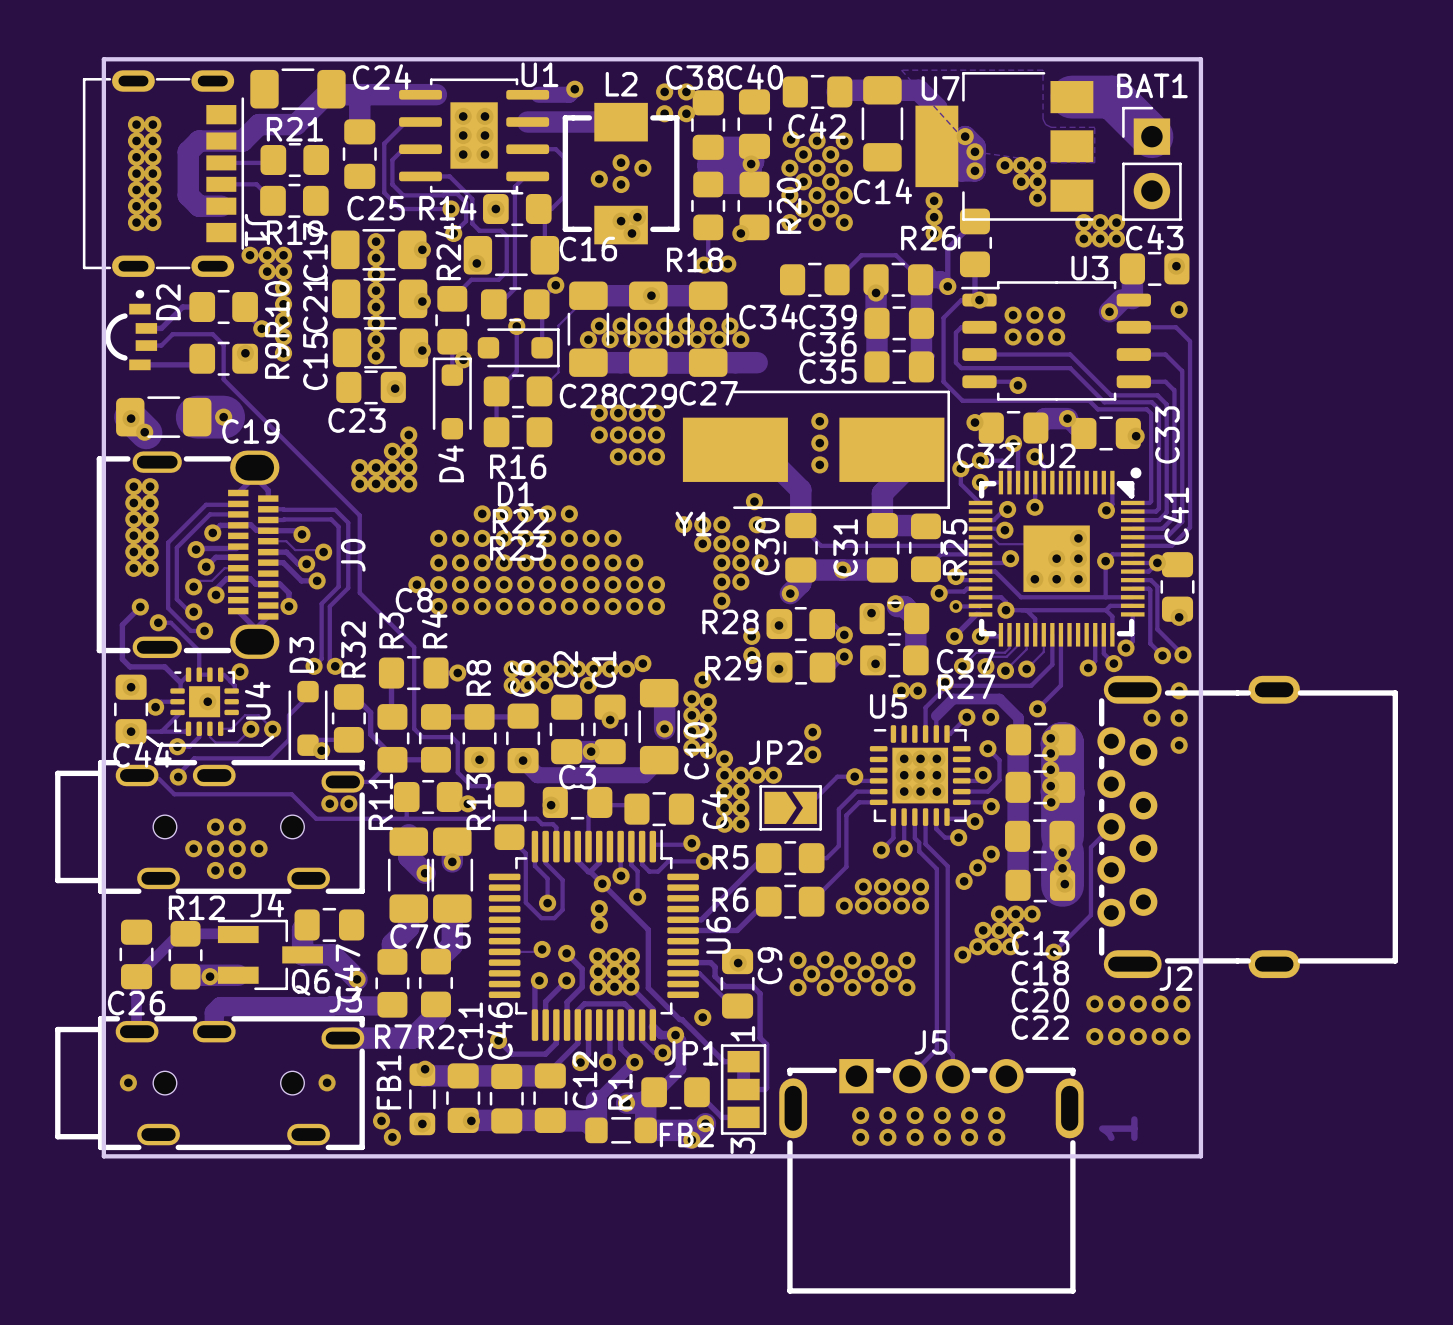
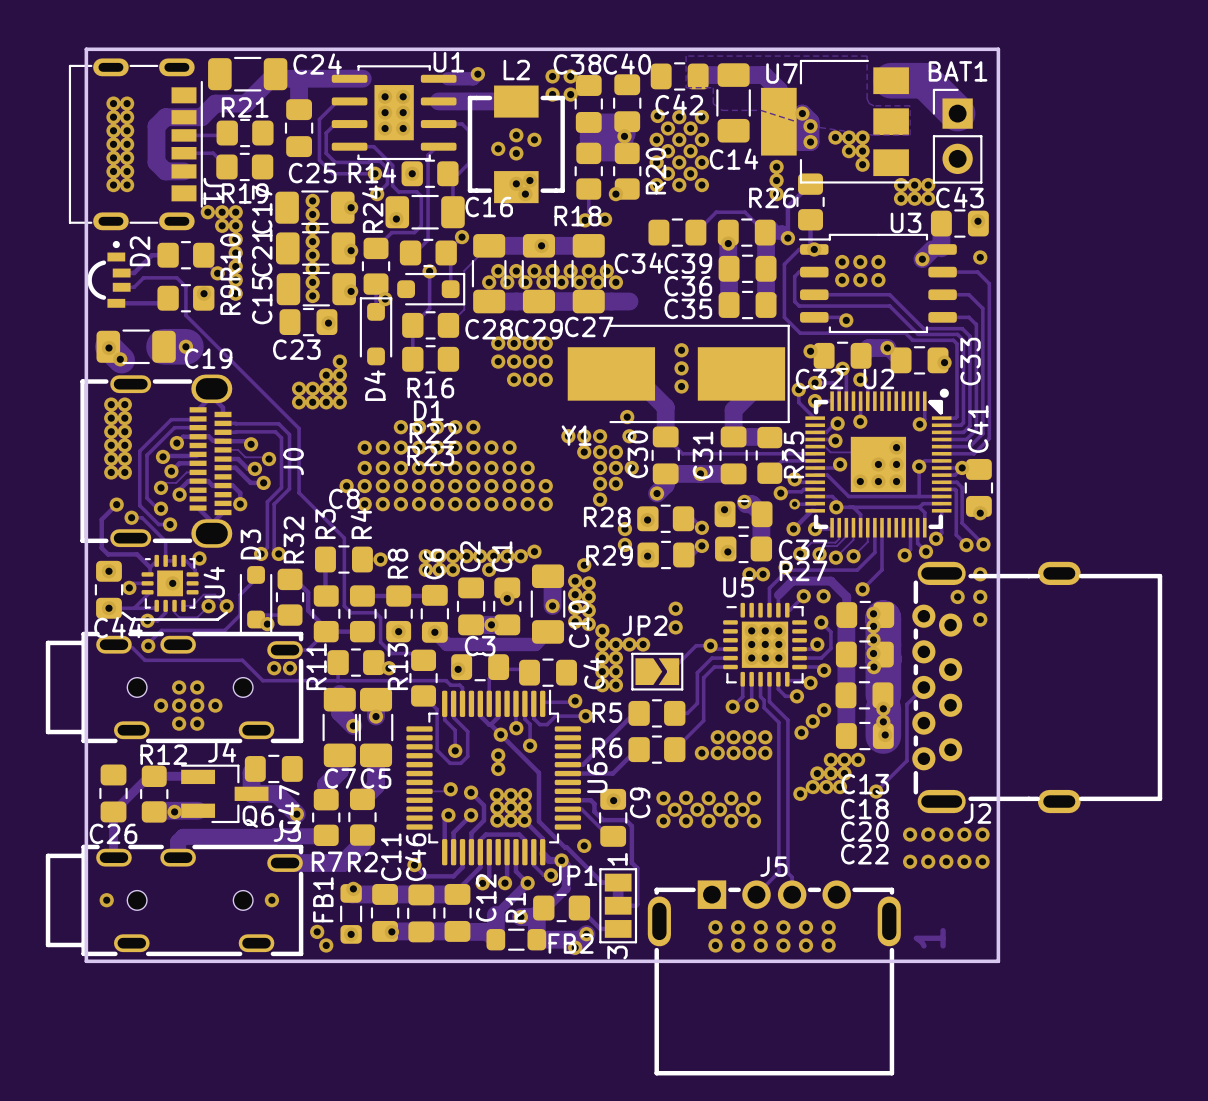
zone outline: (1043, 70) (901, 70) (974, 151) -> (867, 58) (867, 56) (686, 56) (686, 87) (713, 87) (713, 103) (722, 110) (760, 110) (810, 126)

